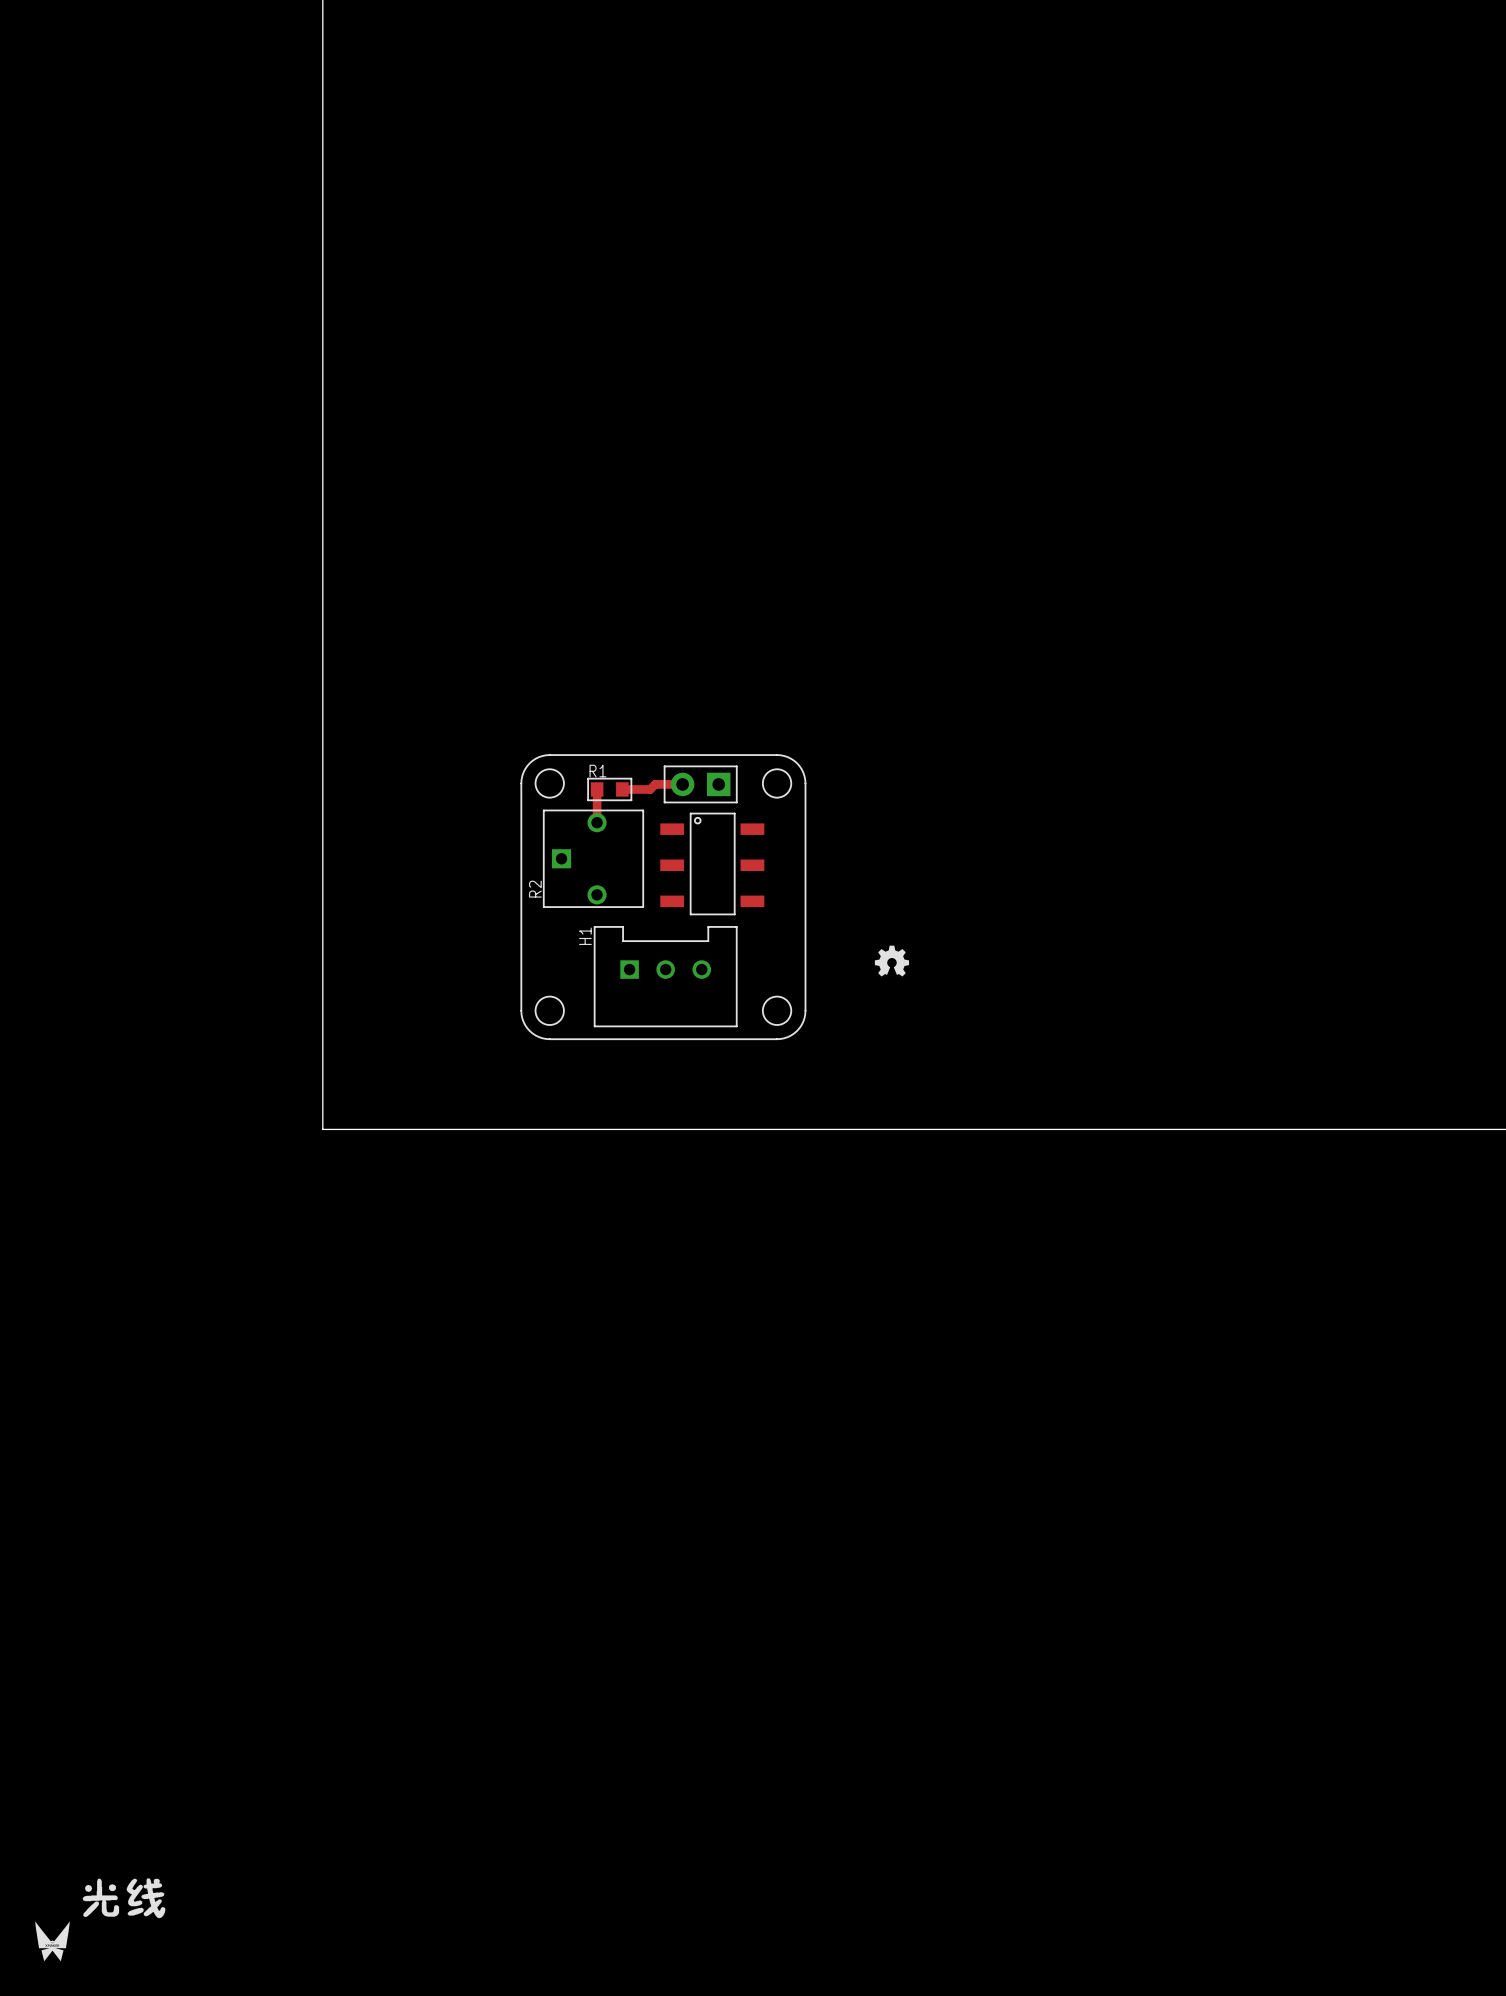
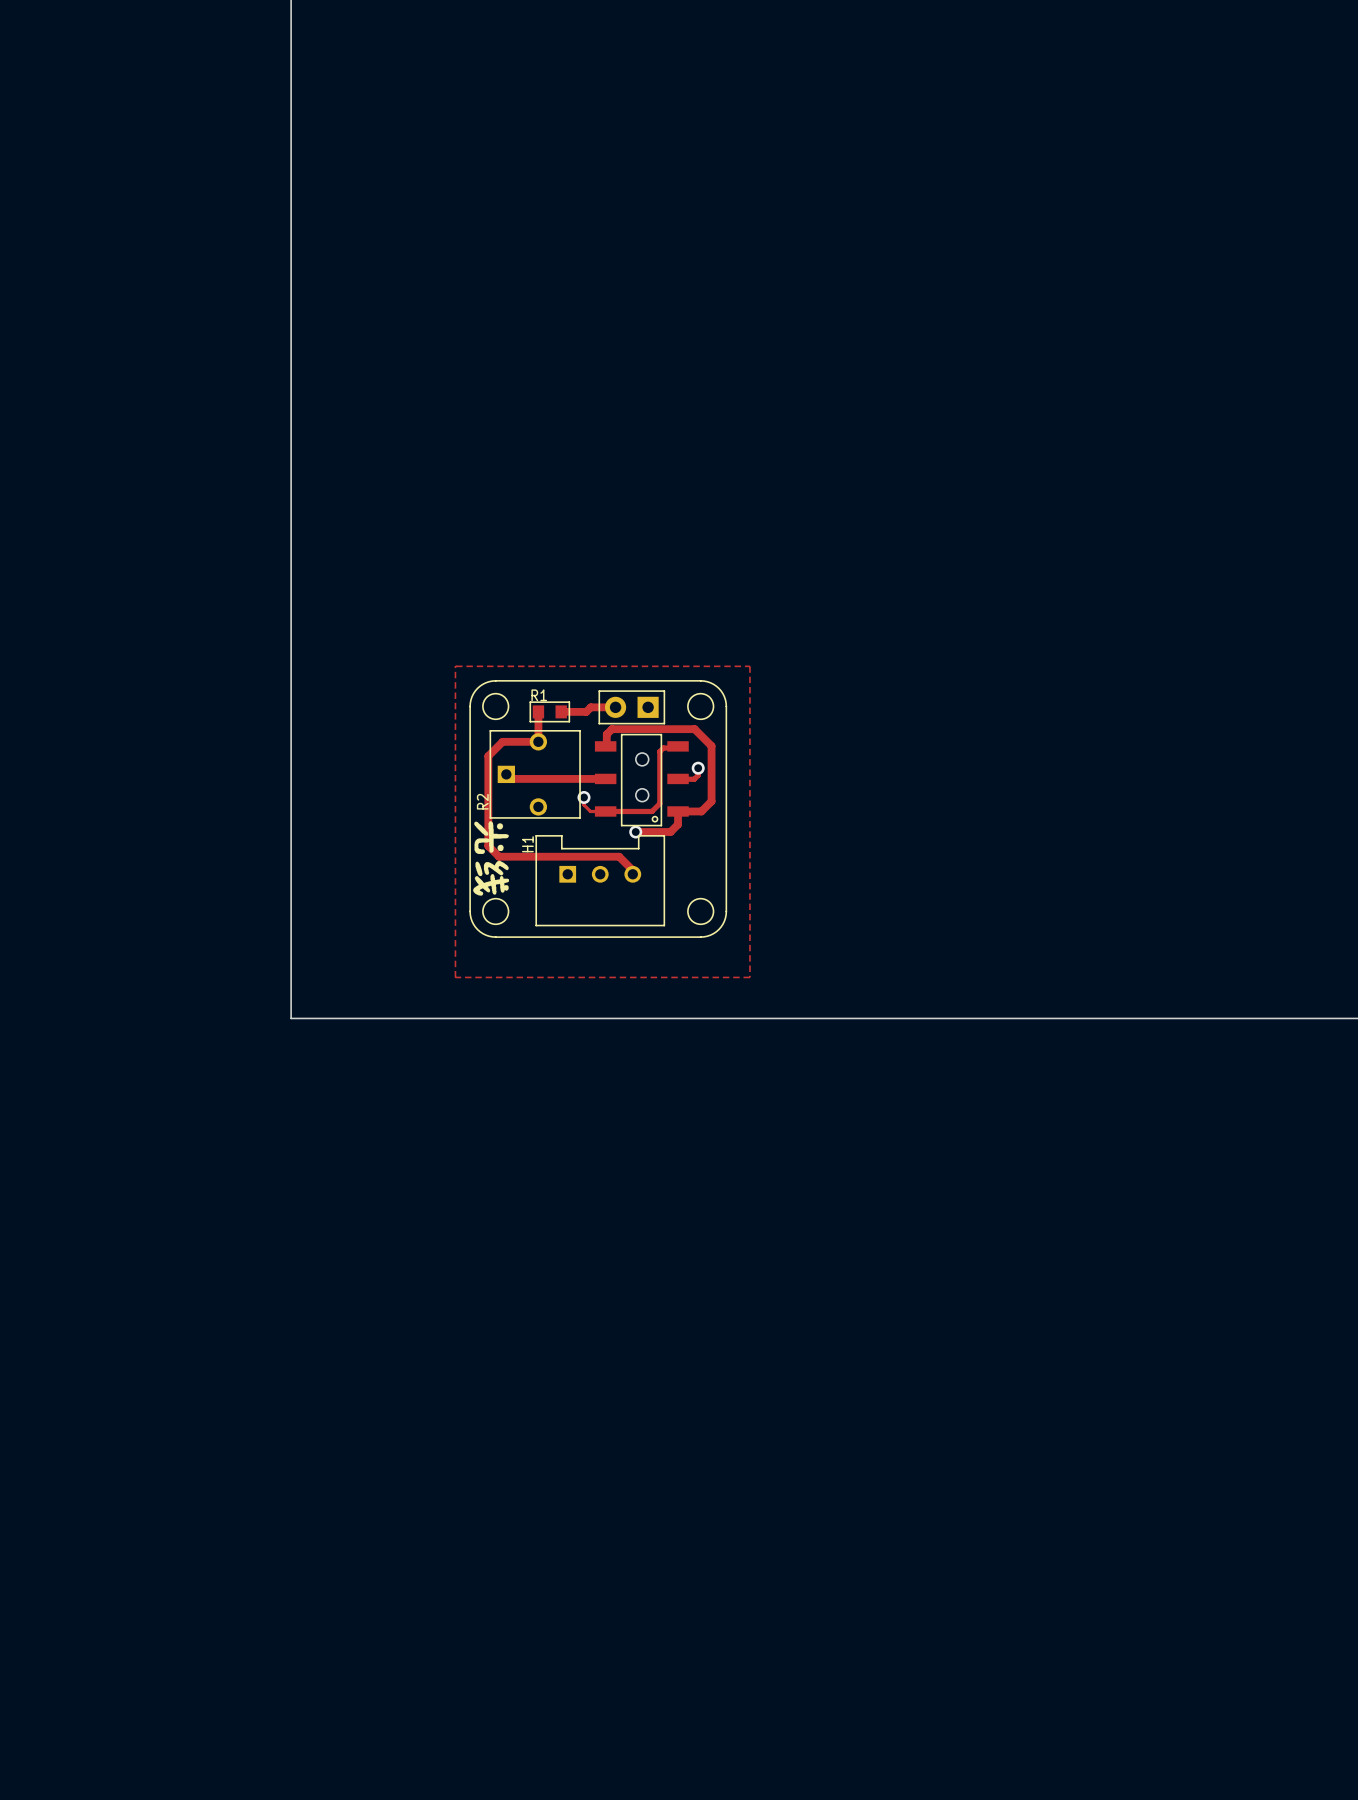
zone outline: none -> (455, 666) (455, 977) (749, 977) (749, 666) (455, 666)
part footprint: [660, 812, 765, 916] -> [594, 733, 689, 827]
track: none -> (538, 741) (502, 741) (488, 756) (488, 845) (499, 856) (619, 856) (632, 870) (632, 874)
track: none -> (605, 746) (606, 734) (611, 729) (694, 729) (711, 746) (711, 801) (701, 811) (678, 811) (678, 824) (670, 831) (635, 831)
track: none -> (678, 746) (663, 748) (659, 751) (659, 803) (652, 811) (590, 811) (583, 804) (583, 797)
track: none -> (698, 768) (698, 775) (694, 779) (678, 778)
via: none -> (698, 768)
track: none -> (506, 774) (510, 778) (605, 778)
via: none -> (583, 797)
drawing: none -> [473, 821, 509, 896]
via: none -> (635, 831)
drawing: [874, 945, 910, 977] -> none
drawing: [35, 1878, 166, 1962] -> none

